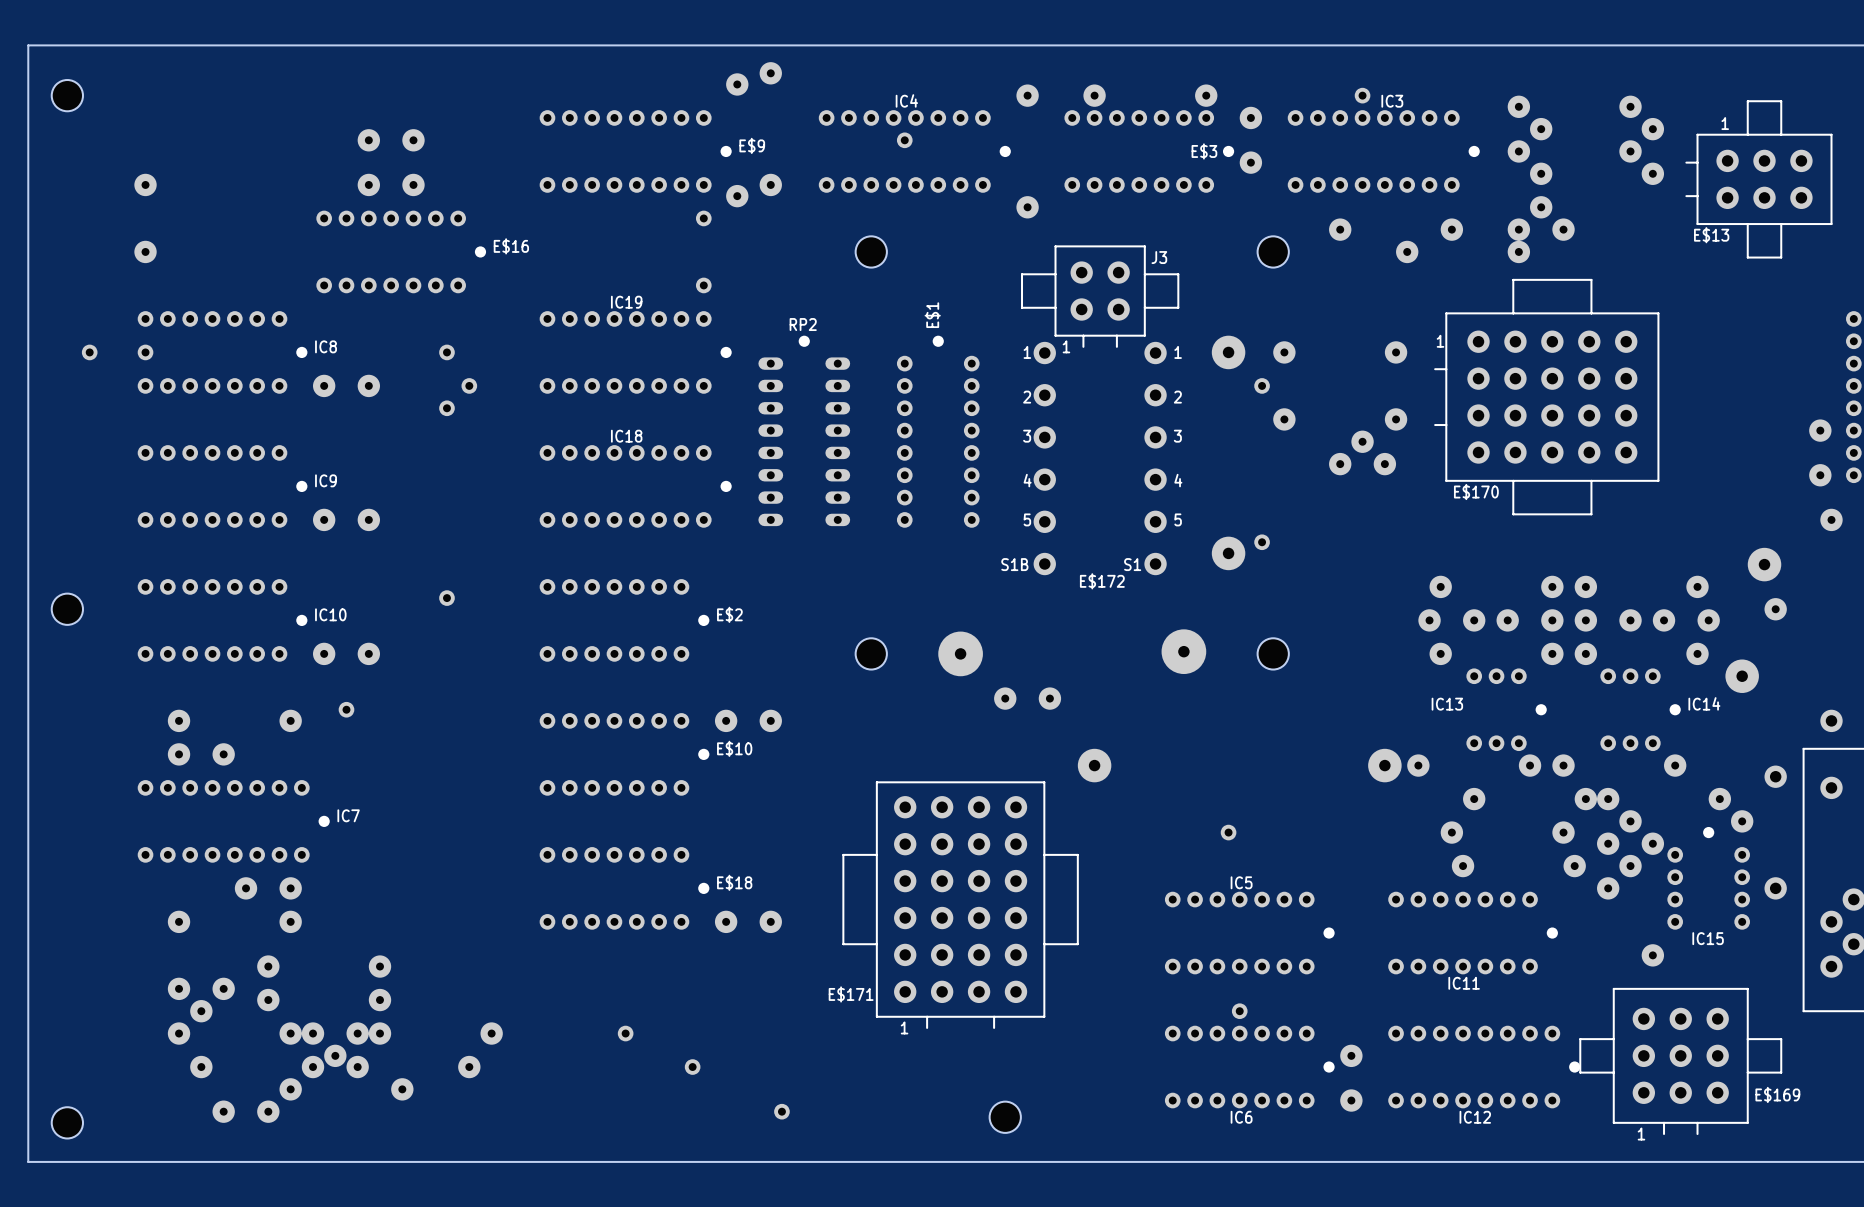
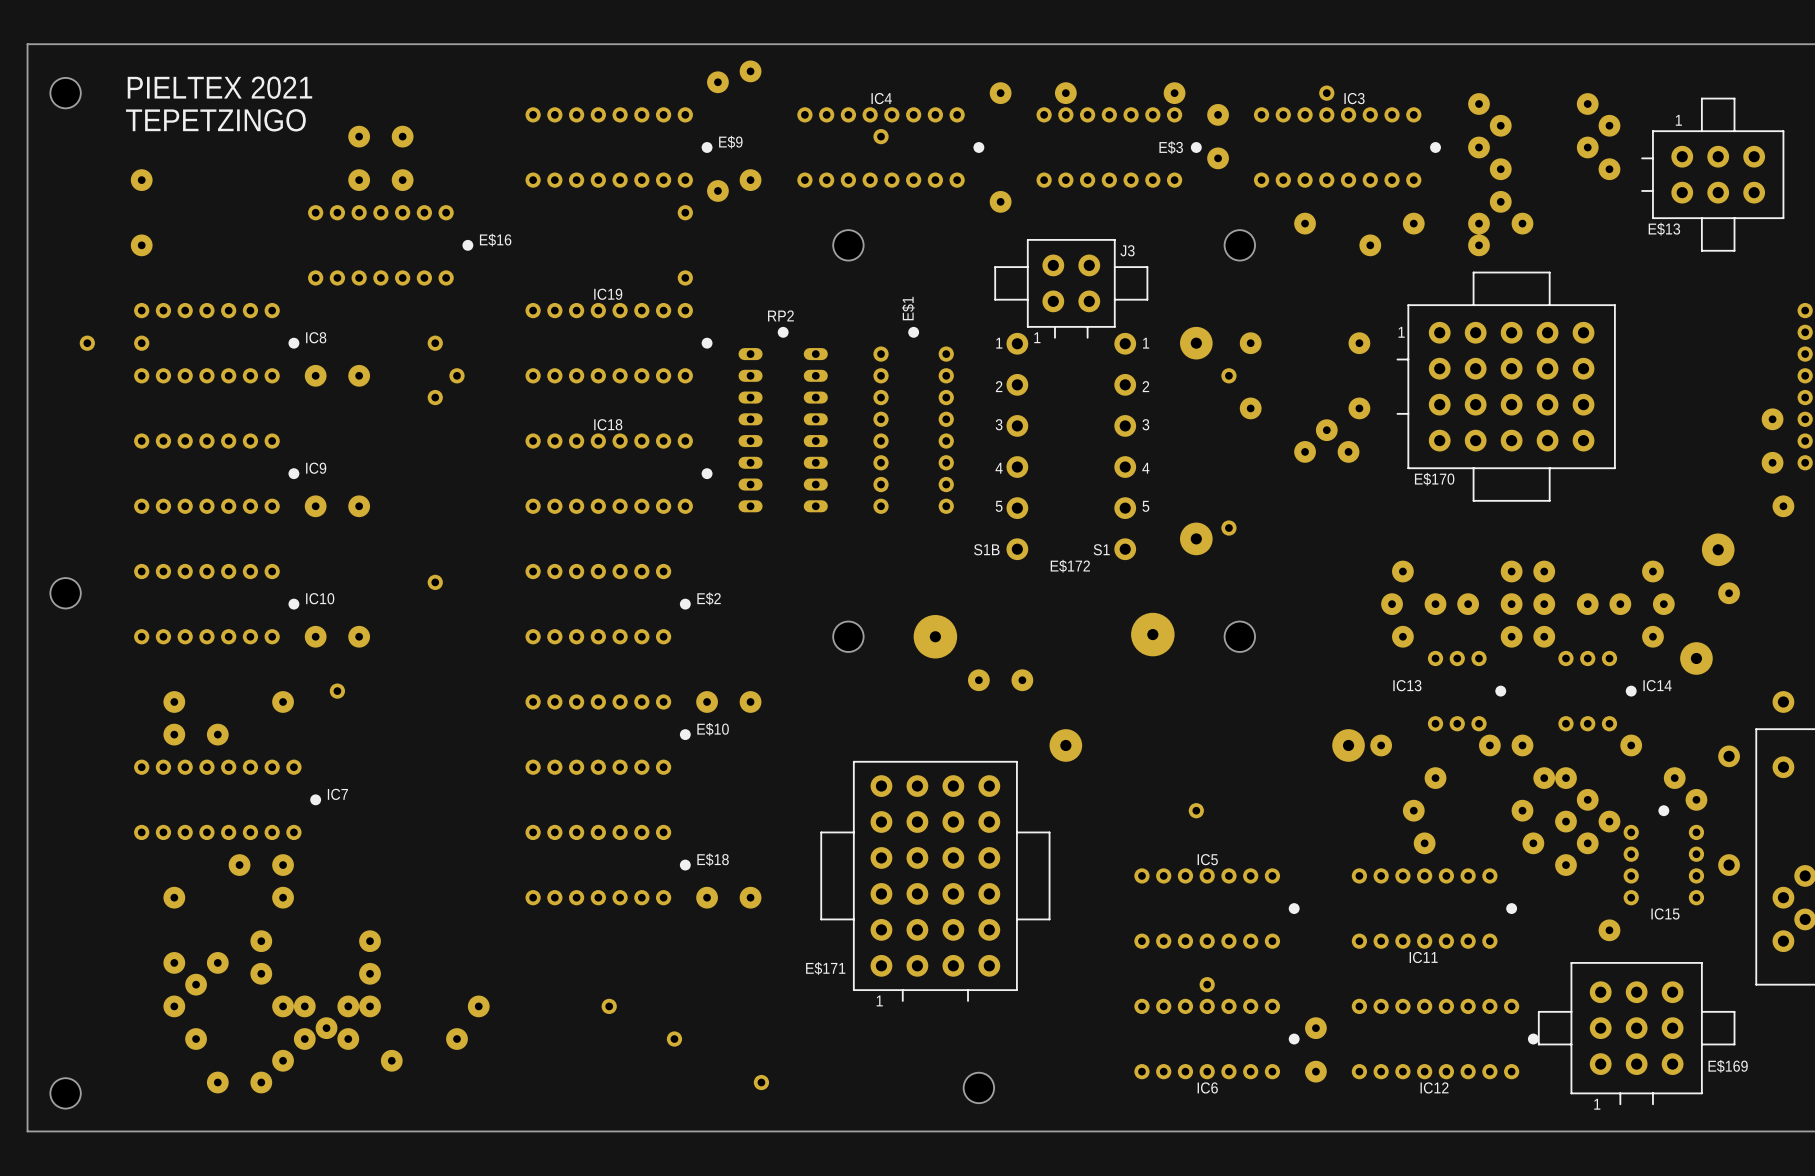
text: none -> PIELTEX 2021 (219, 87)
text: none -> TEPETZINGO (215, 120)

